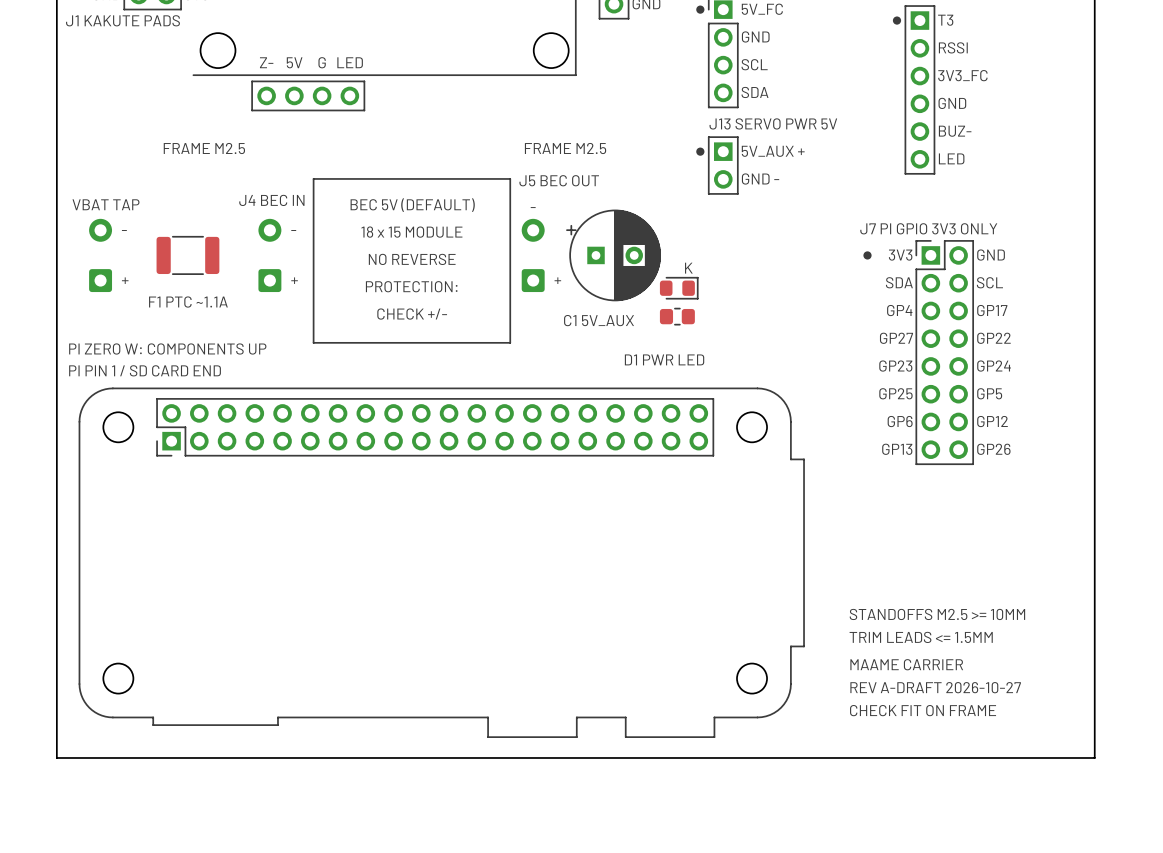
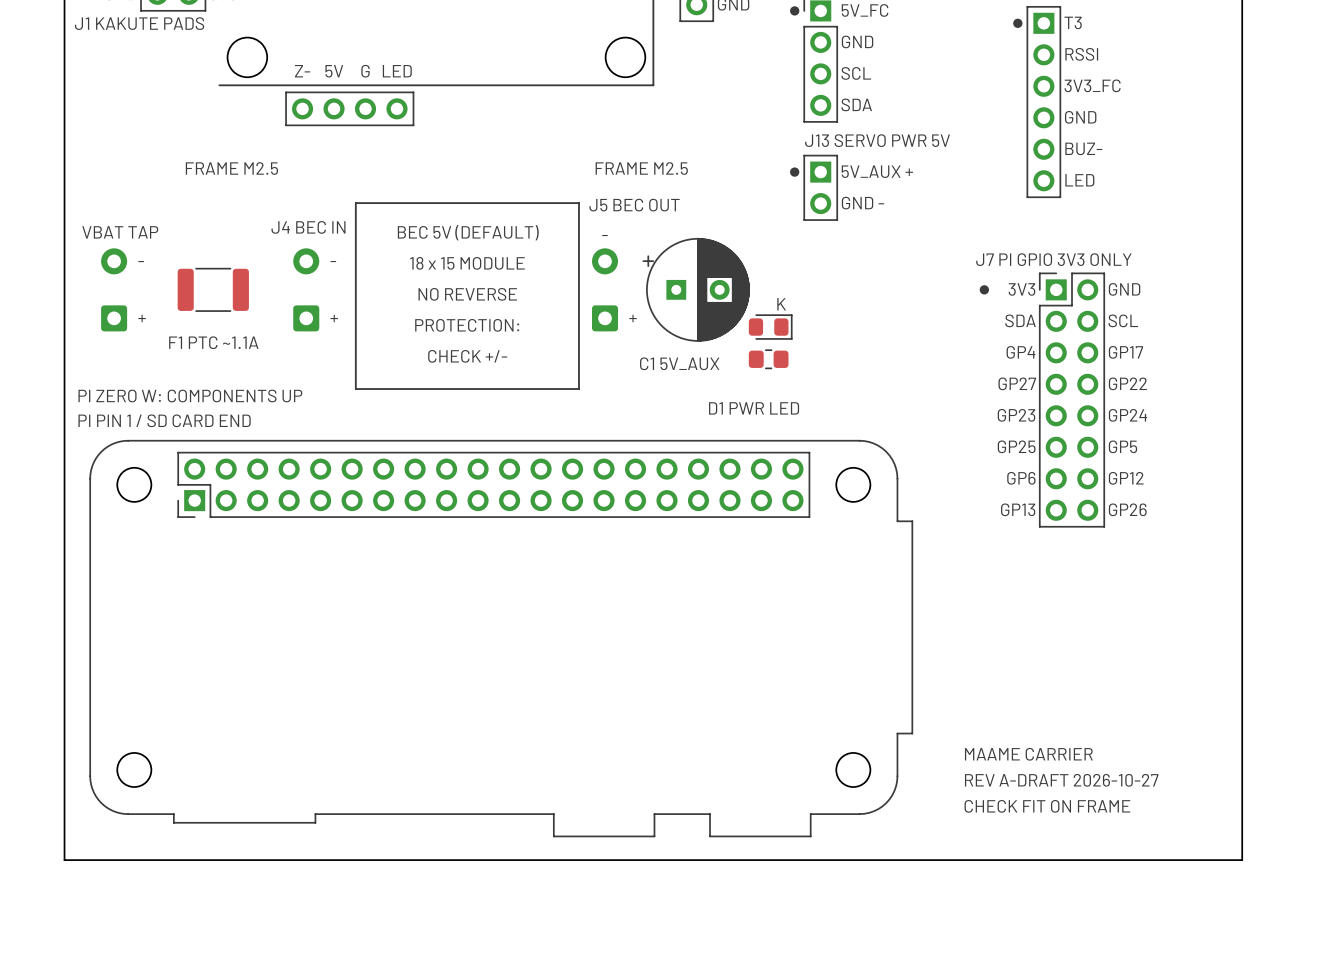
text: STANDOFFS M2.5 >= 10MM (937, 614) -> none
text: TRIM LEADS <= 1.5MM (921, 637) -> none

